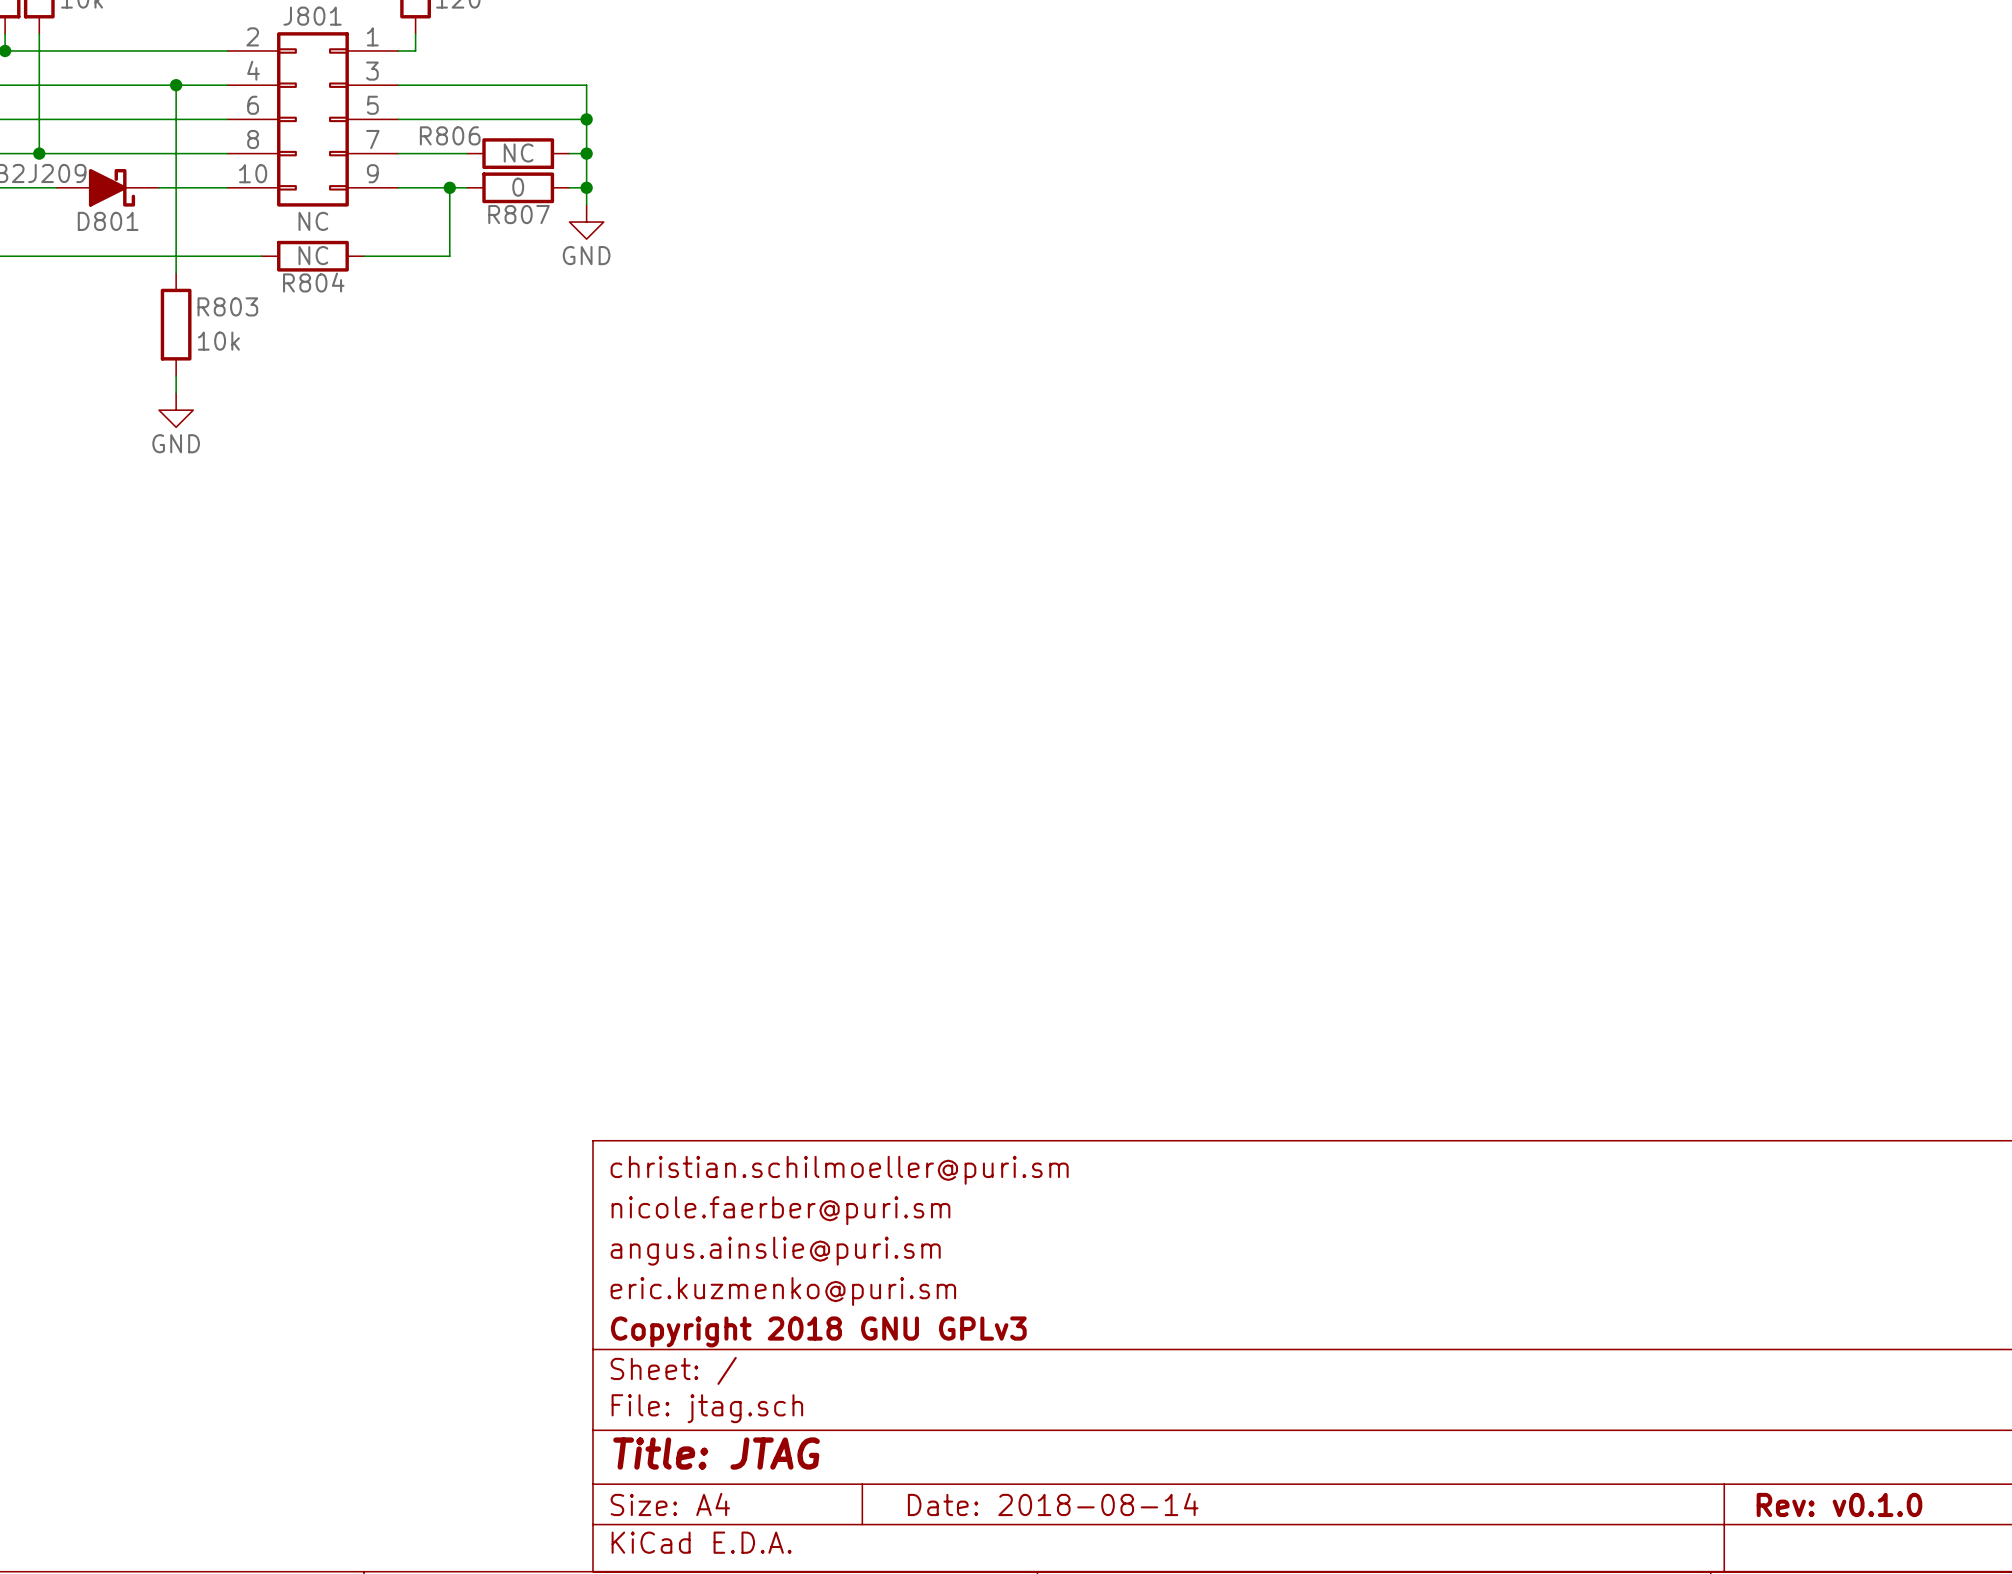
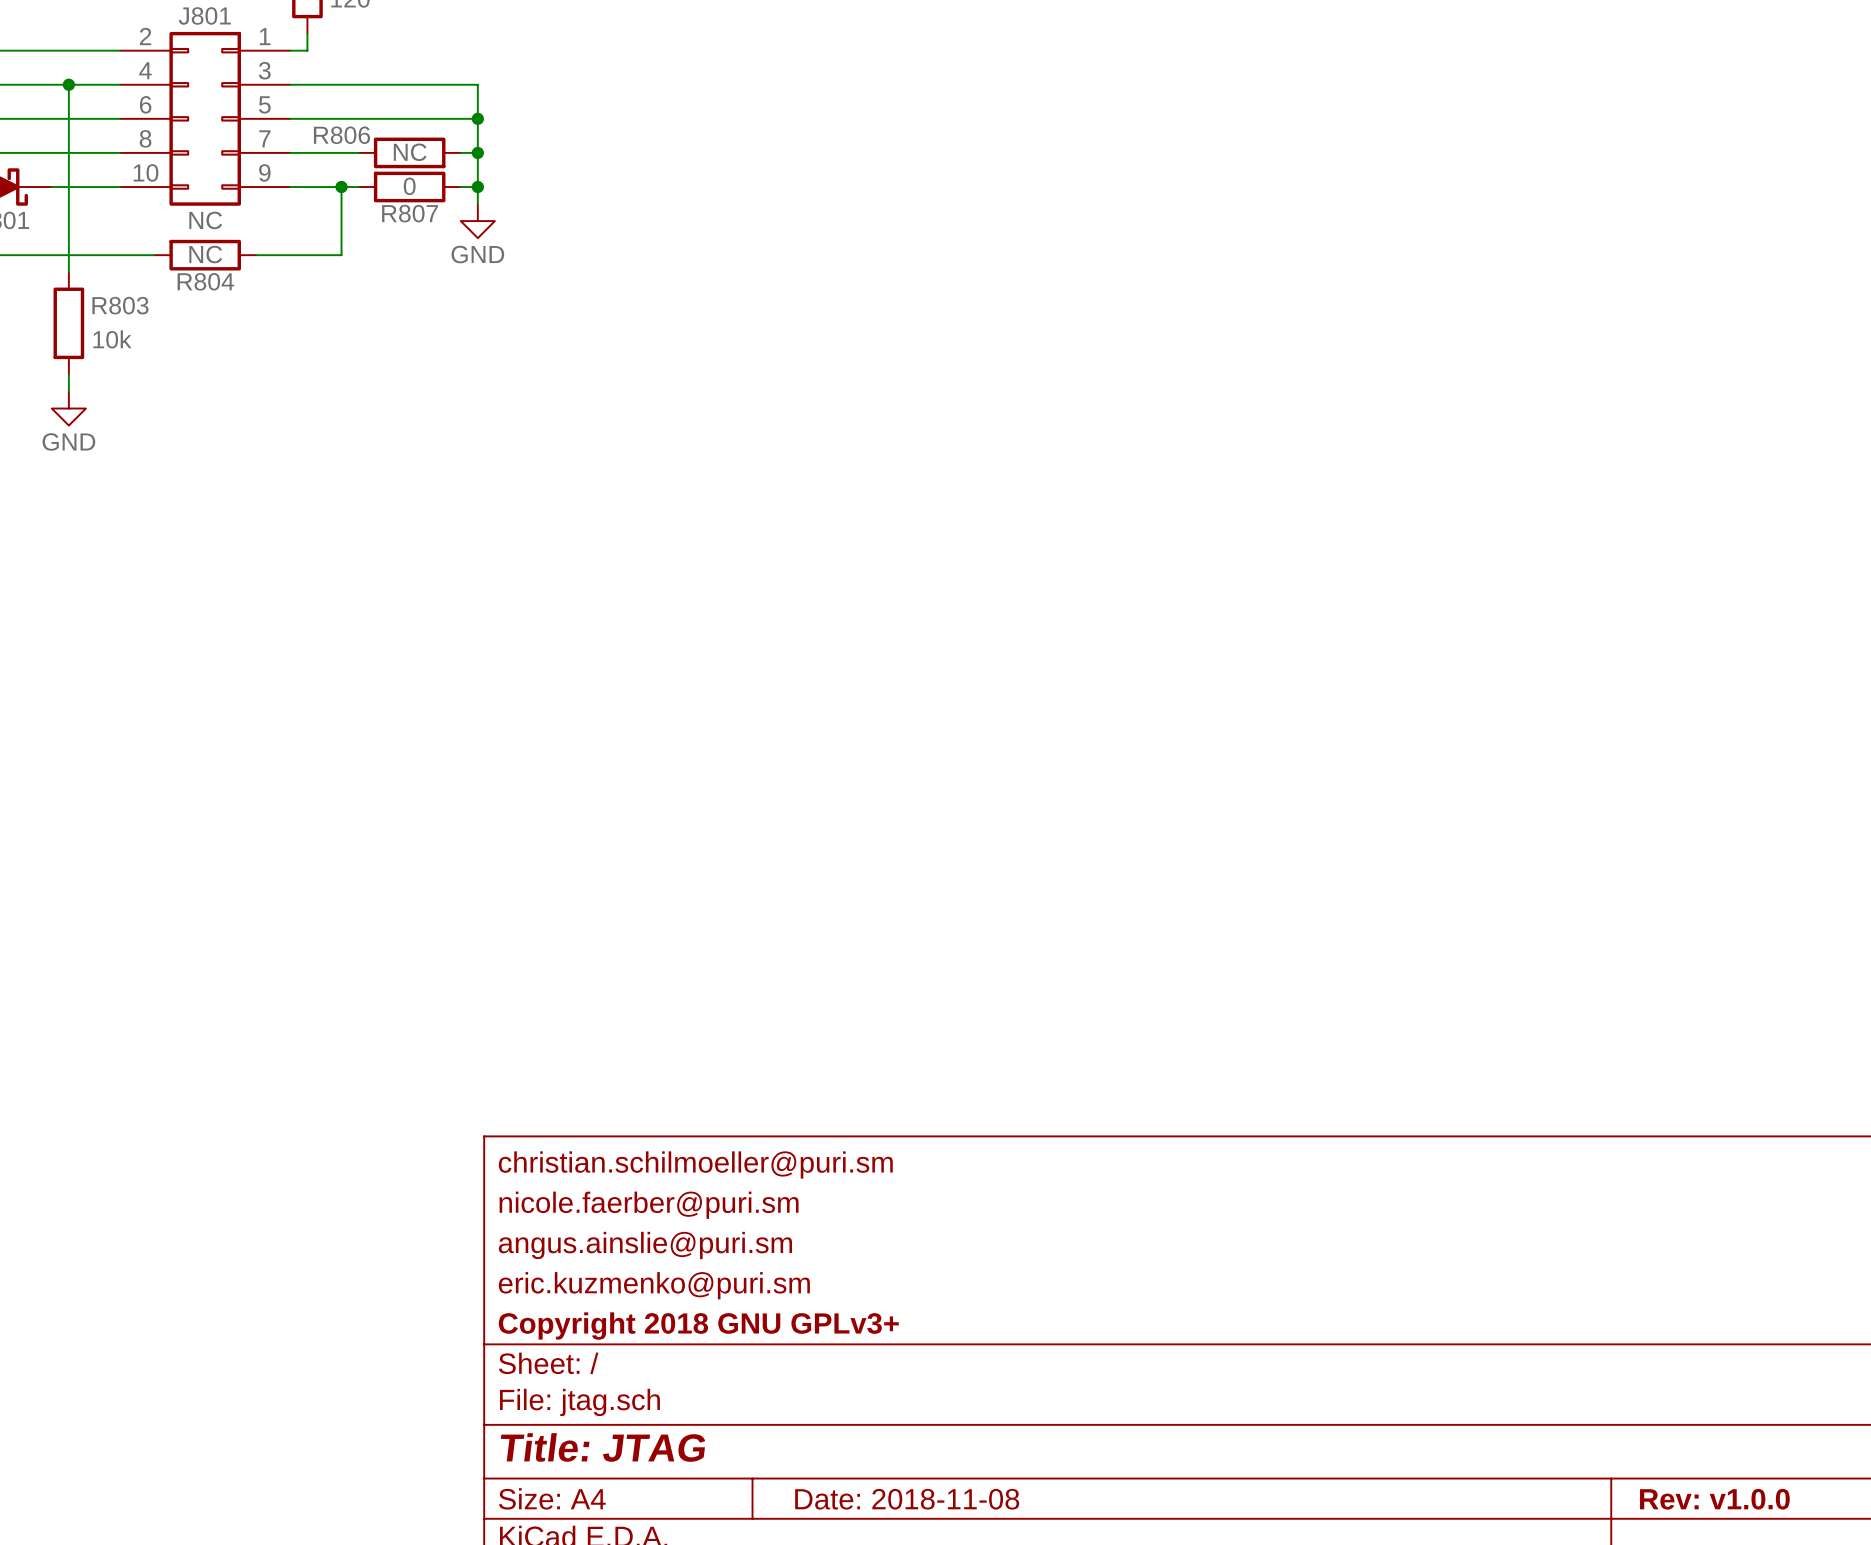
title block: Copyright 2018 GNU GPLv3 (818, 1331) -> Copyright 2018 GNU GPLv3+ (698, 1326)
title block: Date: 2018-08-14 (1053, 1504) -> Date: 2018-11-08 (907, 1499)
title block: Rev: v0.1.0 (1839, 1504) -> Rev: v1.0.0 (1714, 1499)

